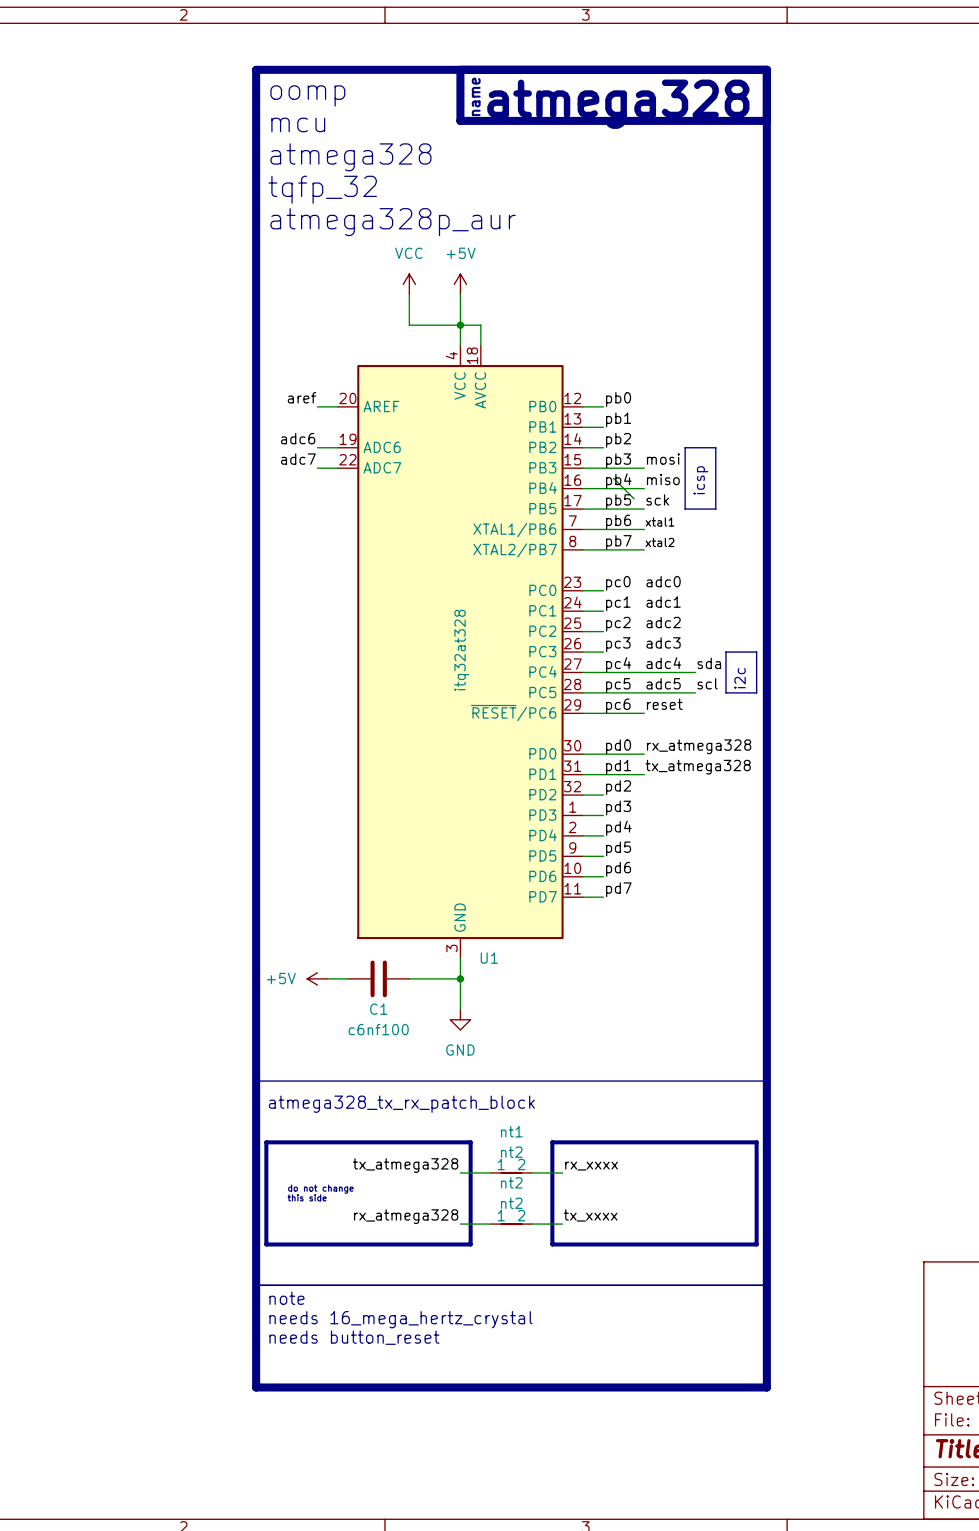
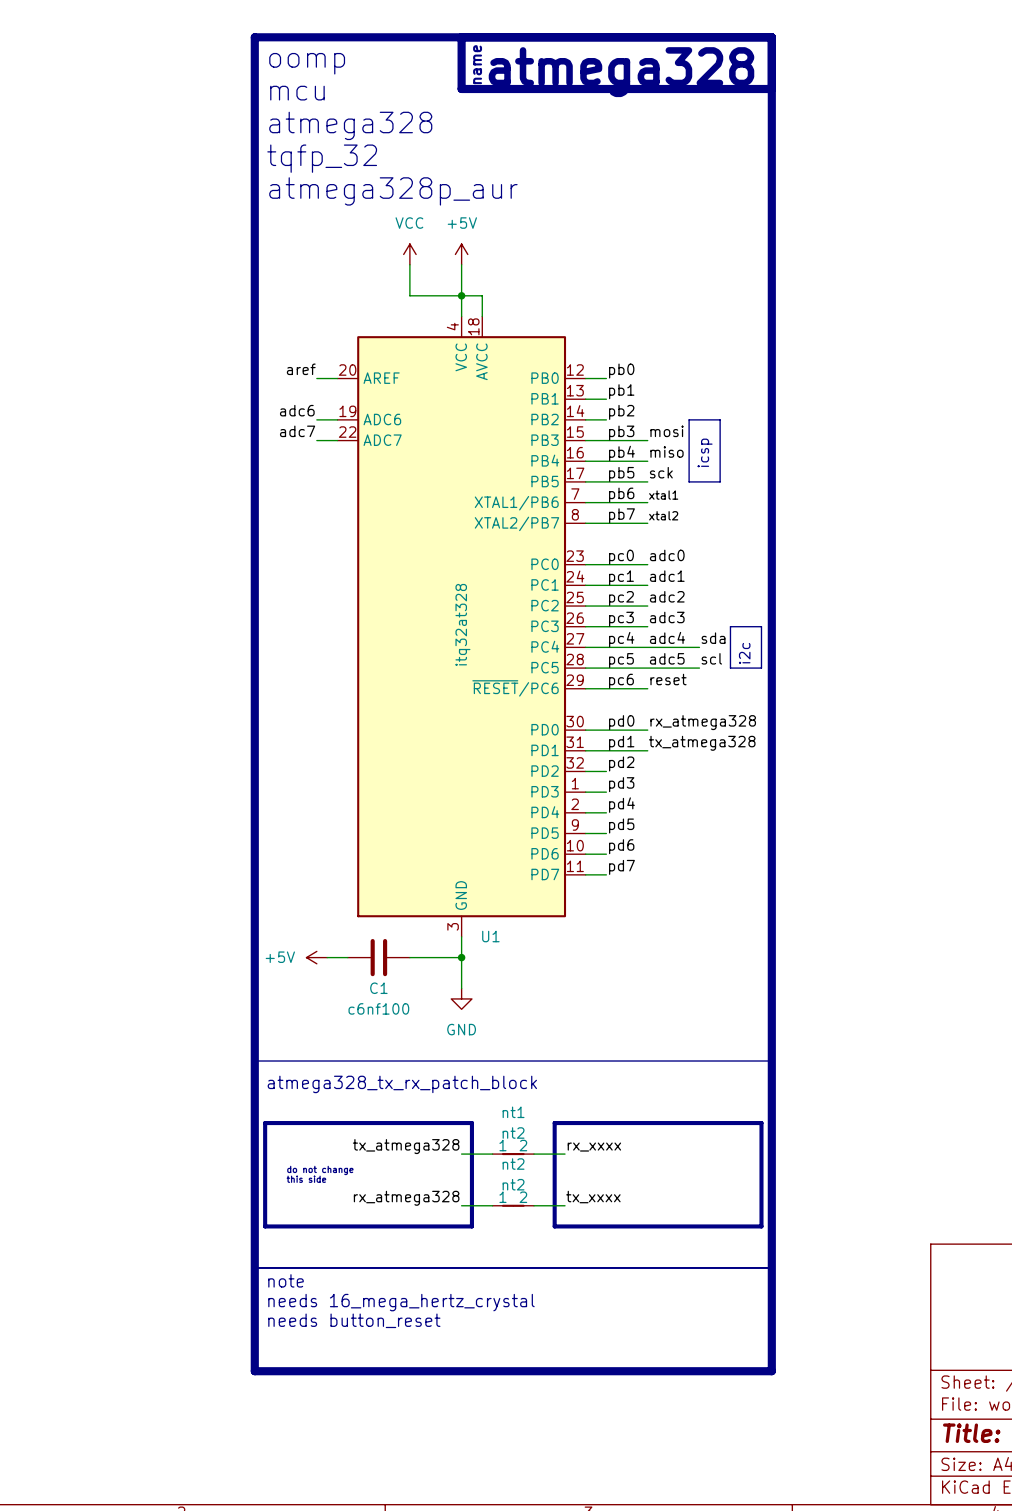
wire: (613, 478) (634, 498) -> none
wire: none -> (606, 564) (647, 564)
wire: none -> (606, 585) (647, 585)
wire: none -> (606, 606) (647, 606)
wire: none -> (606, 626) (647, 626)

